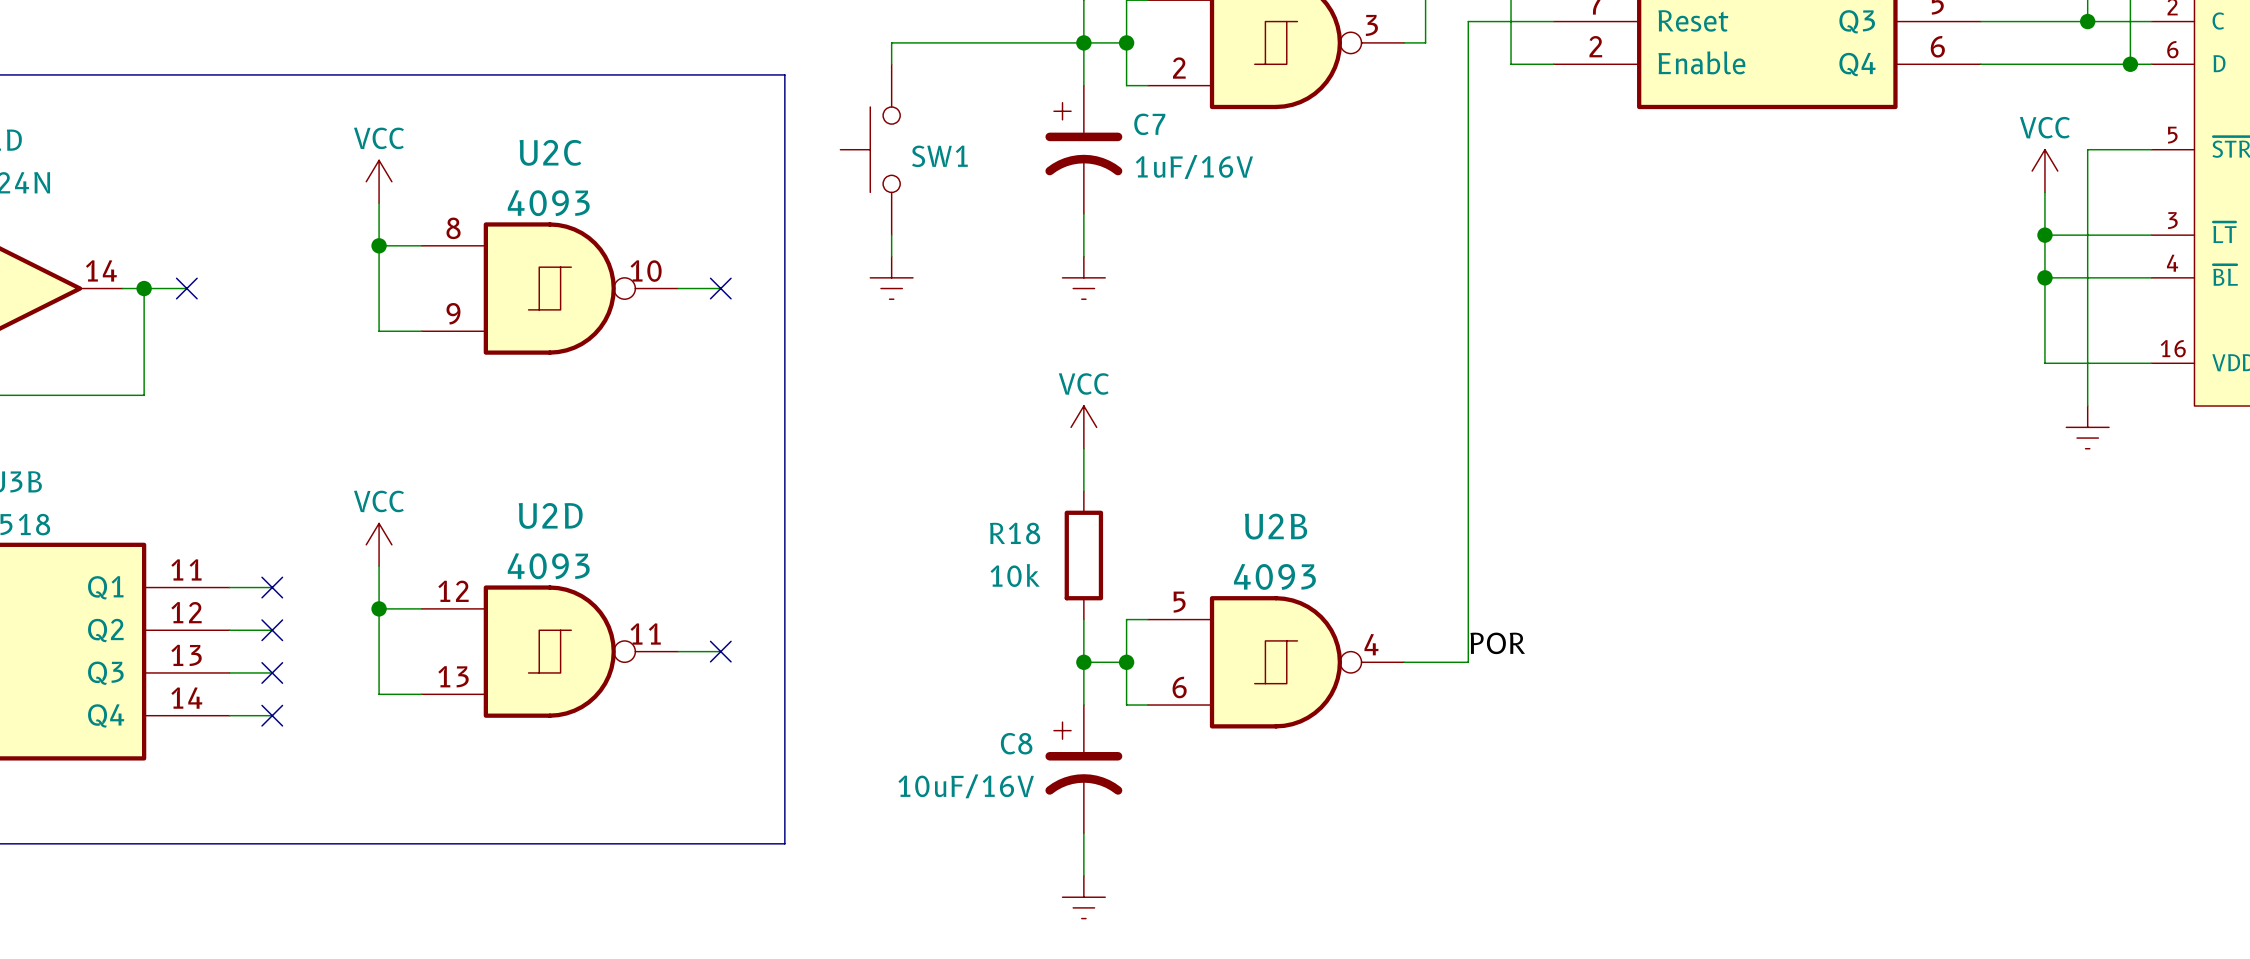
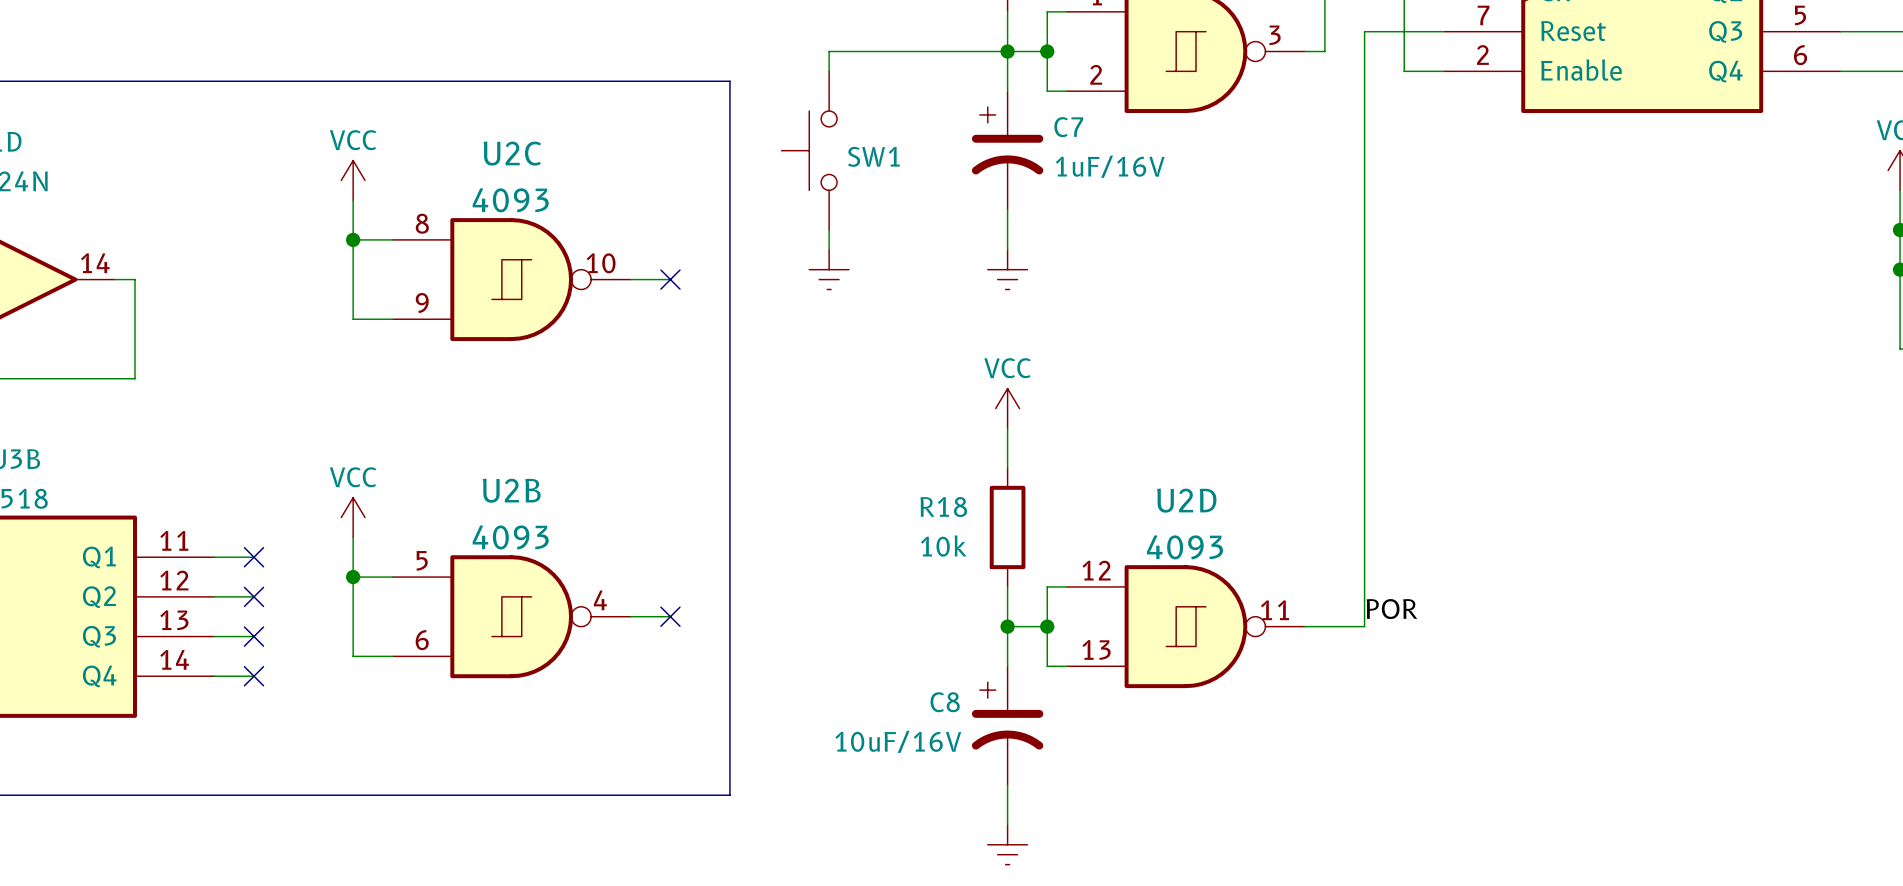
wire: (144, 288) (186, 288) -> none
junction: (144, 288) -> none
no-connect mark: (186, 288) -> none
U2D position: (549, 651) -> (1186, 626)
U2B position: (1276, 662) -> (511, 616)

